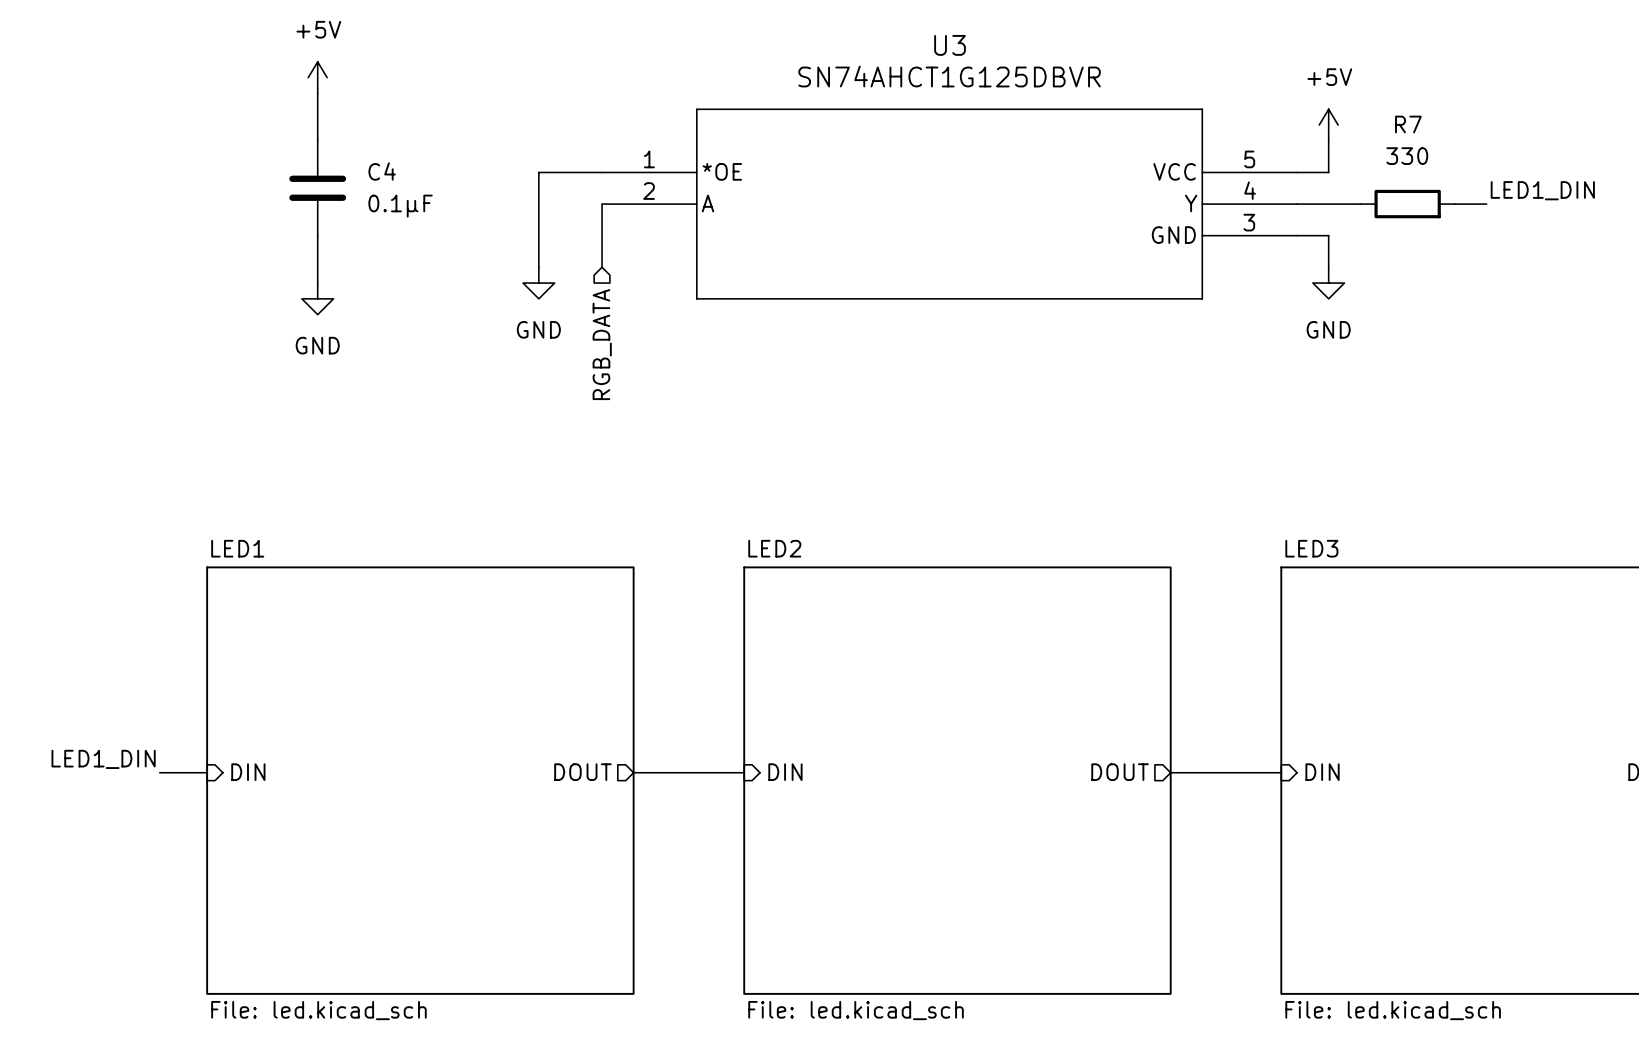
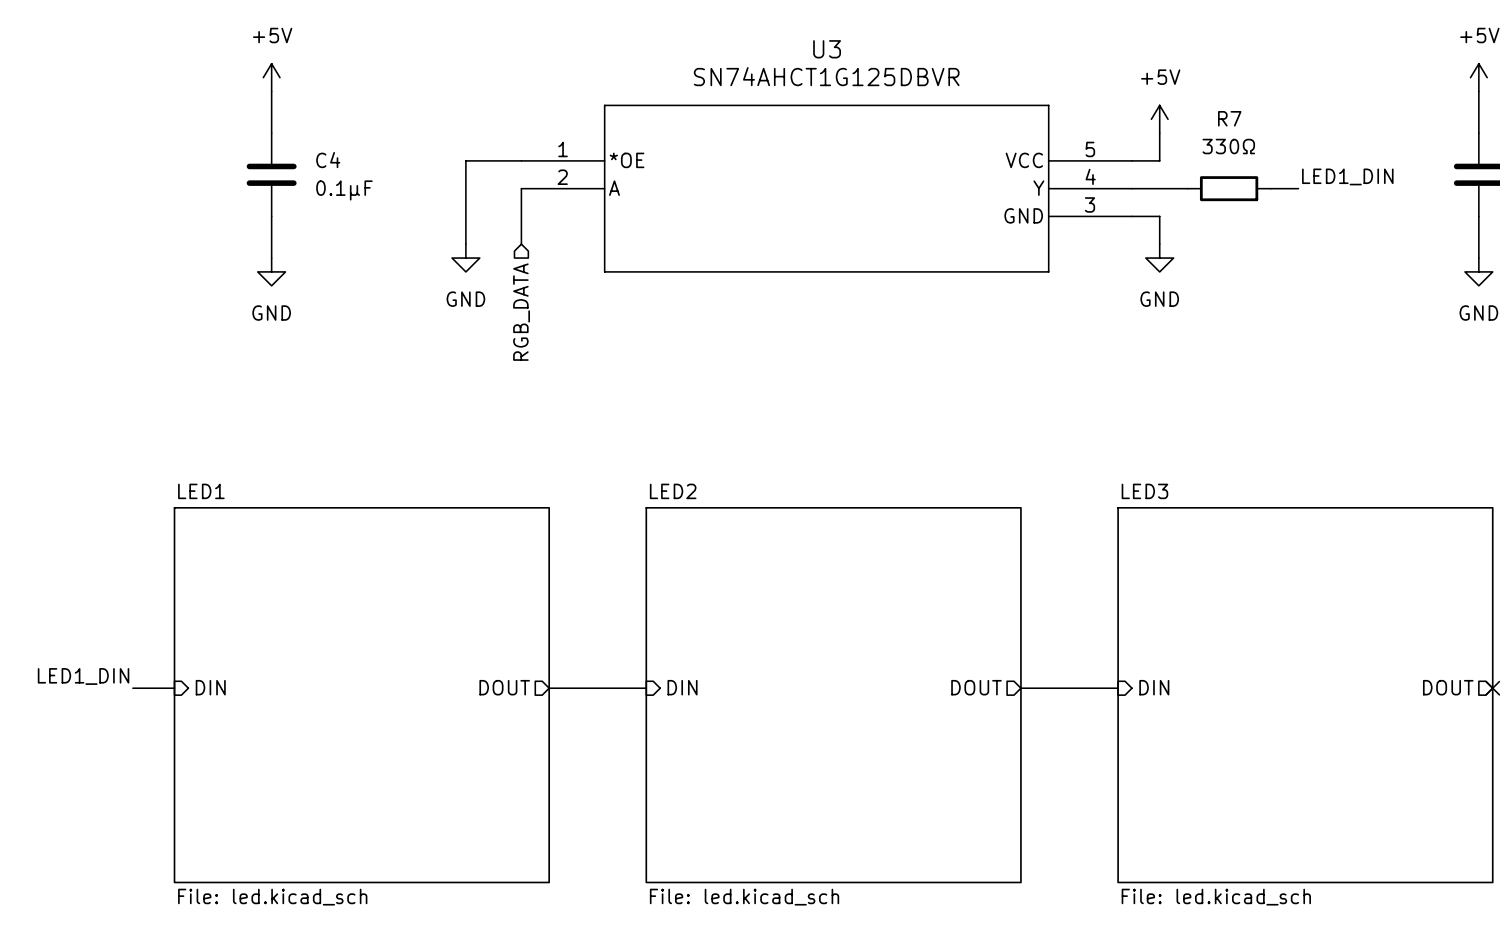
R7 value: 330 (1407, 156) -> 330Ω (1228, 146)

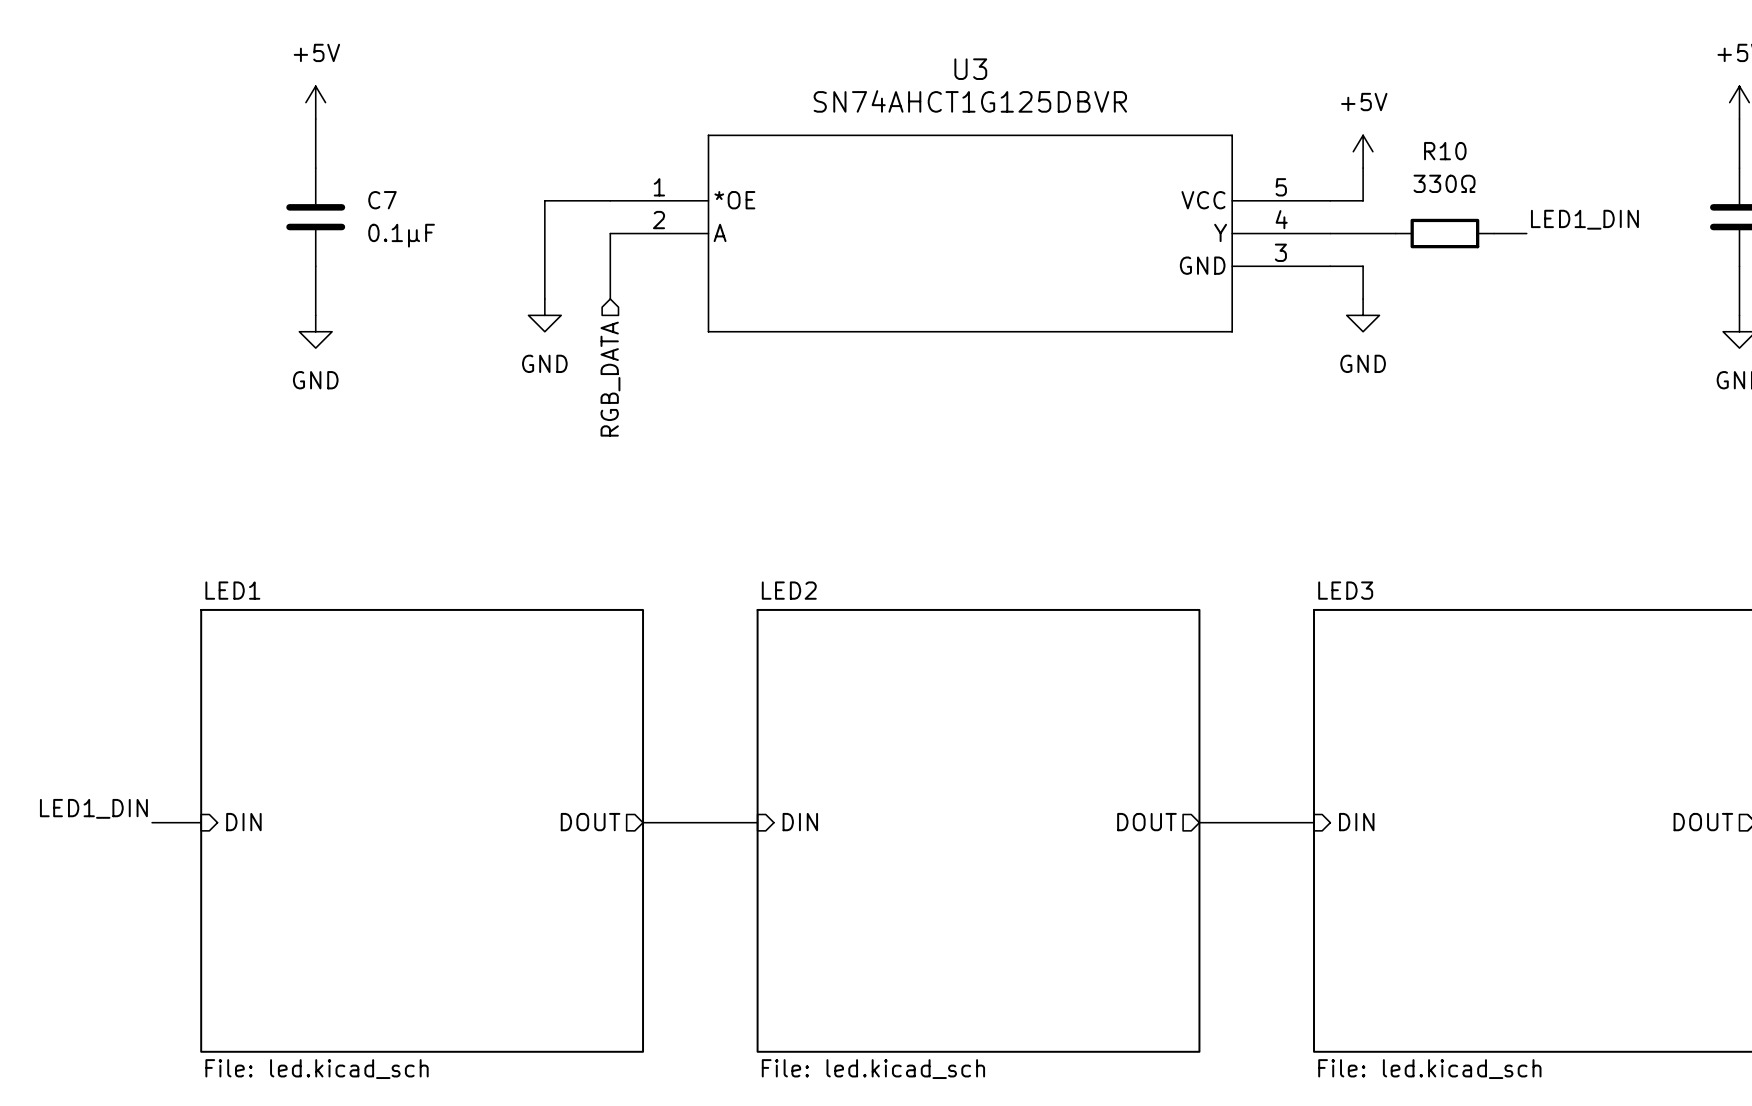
R7 name: R7 (1229, 118) -> R10 (1445, 151)
C4 name: C4 (328, 160) -> C7 (382, 200)

